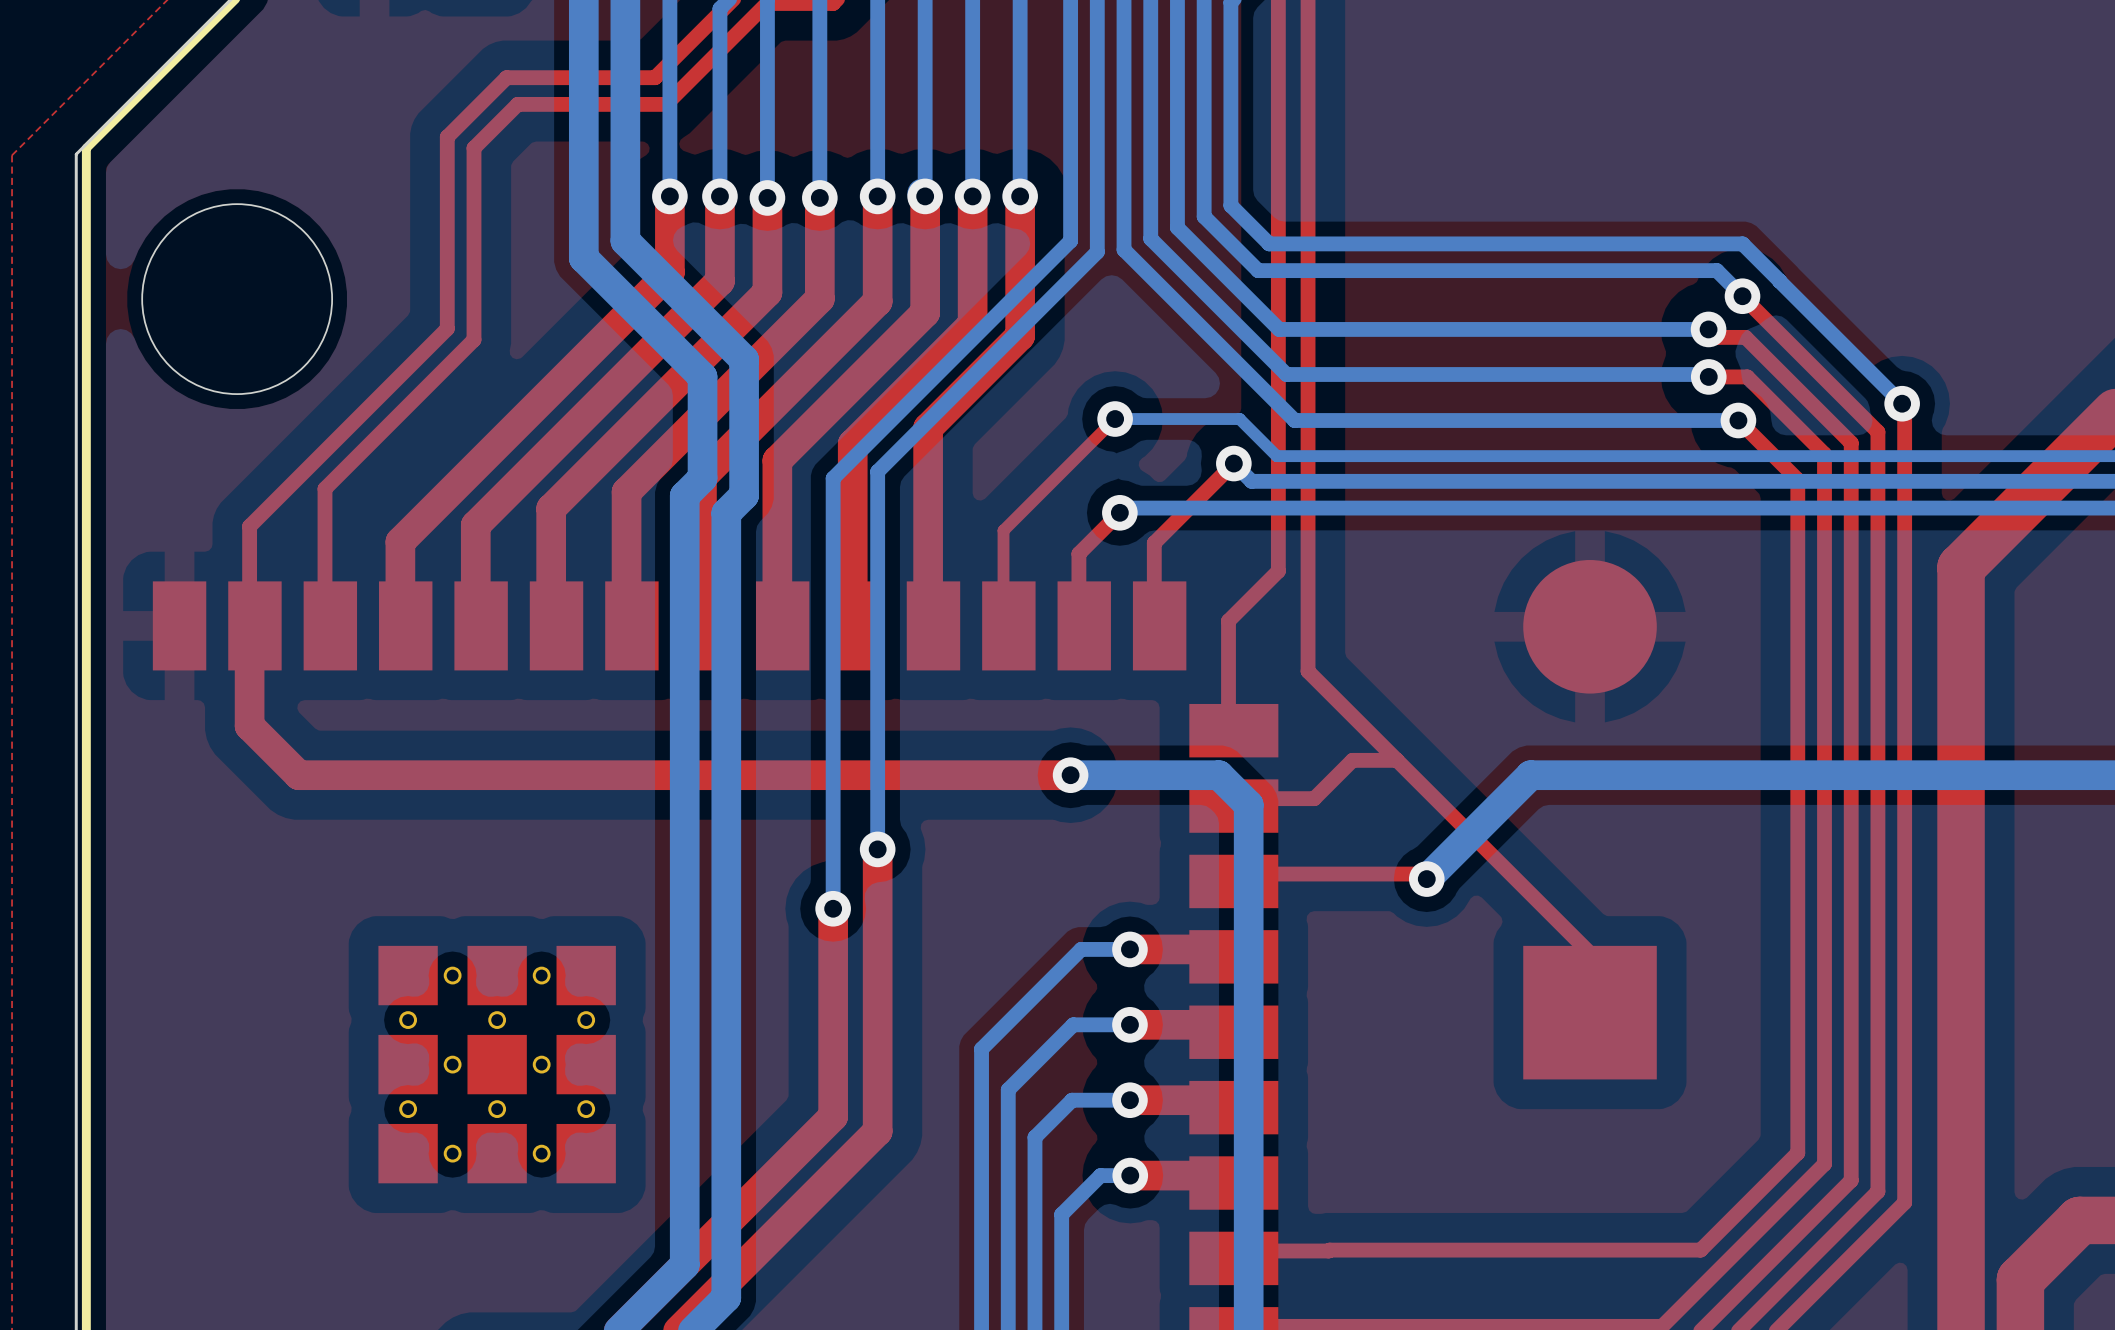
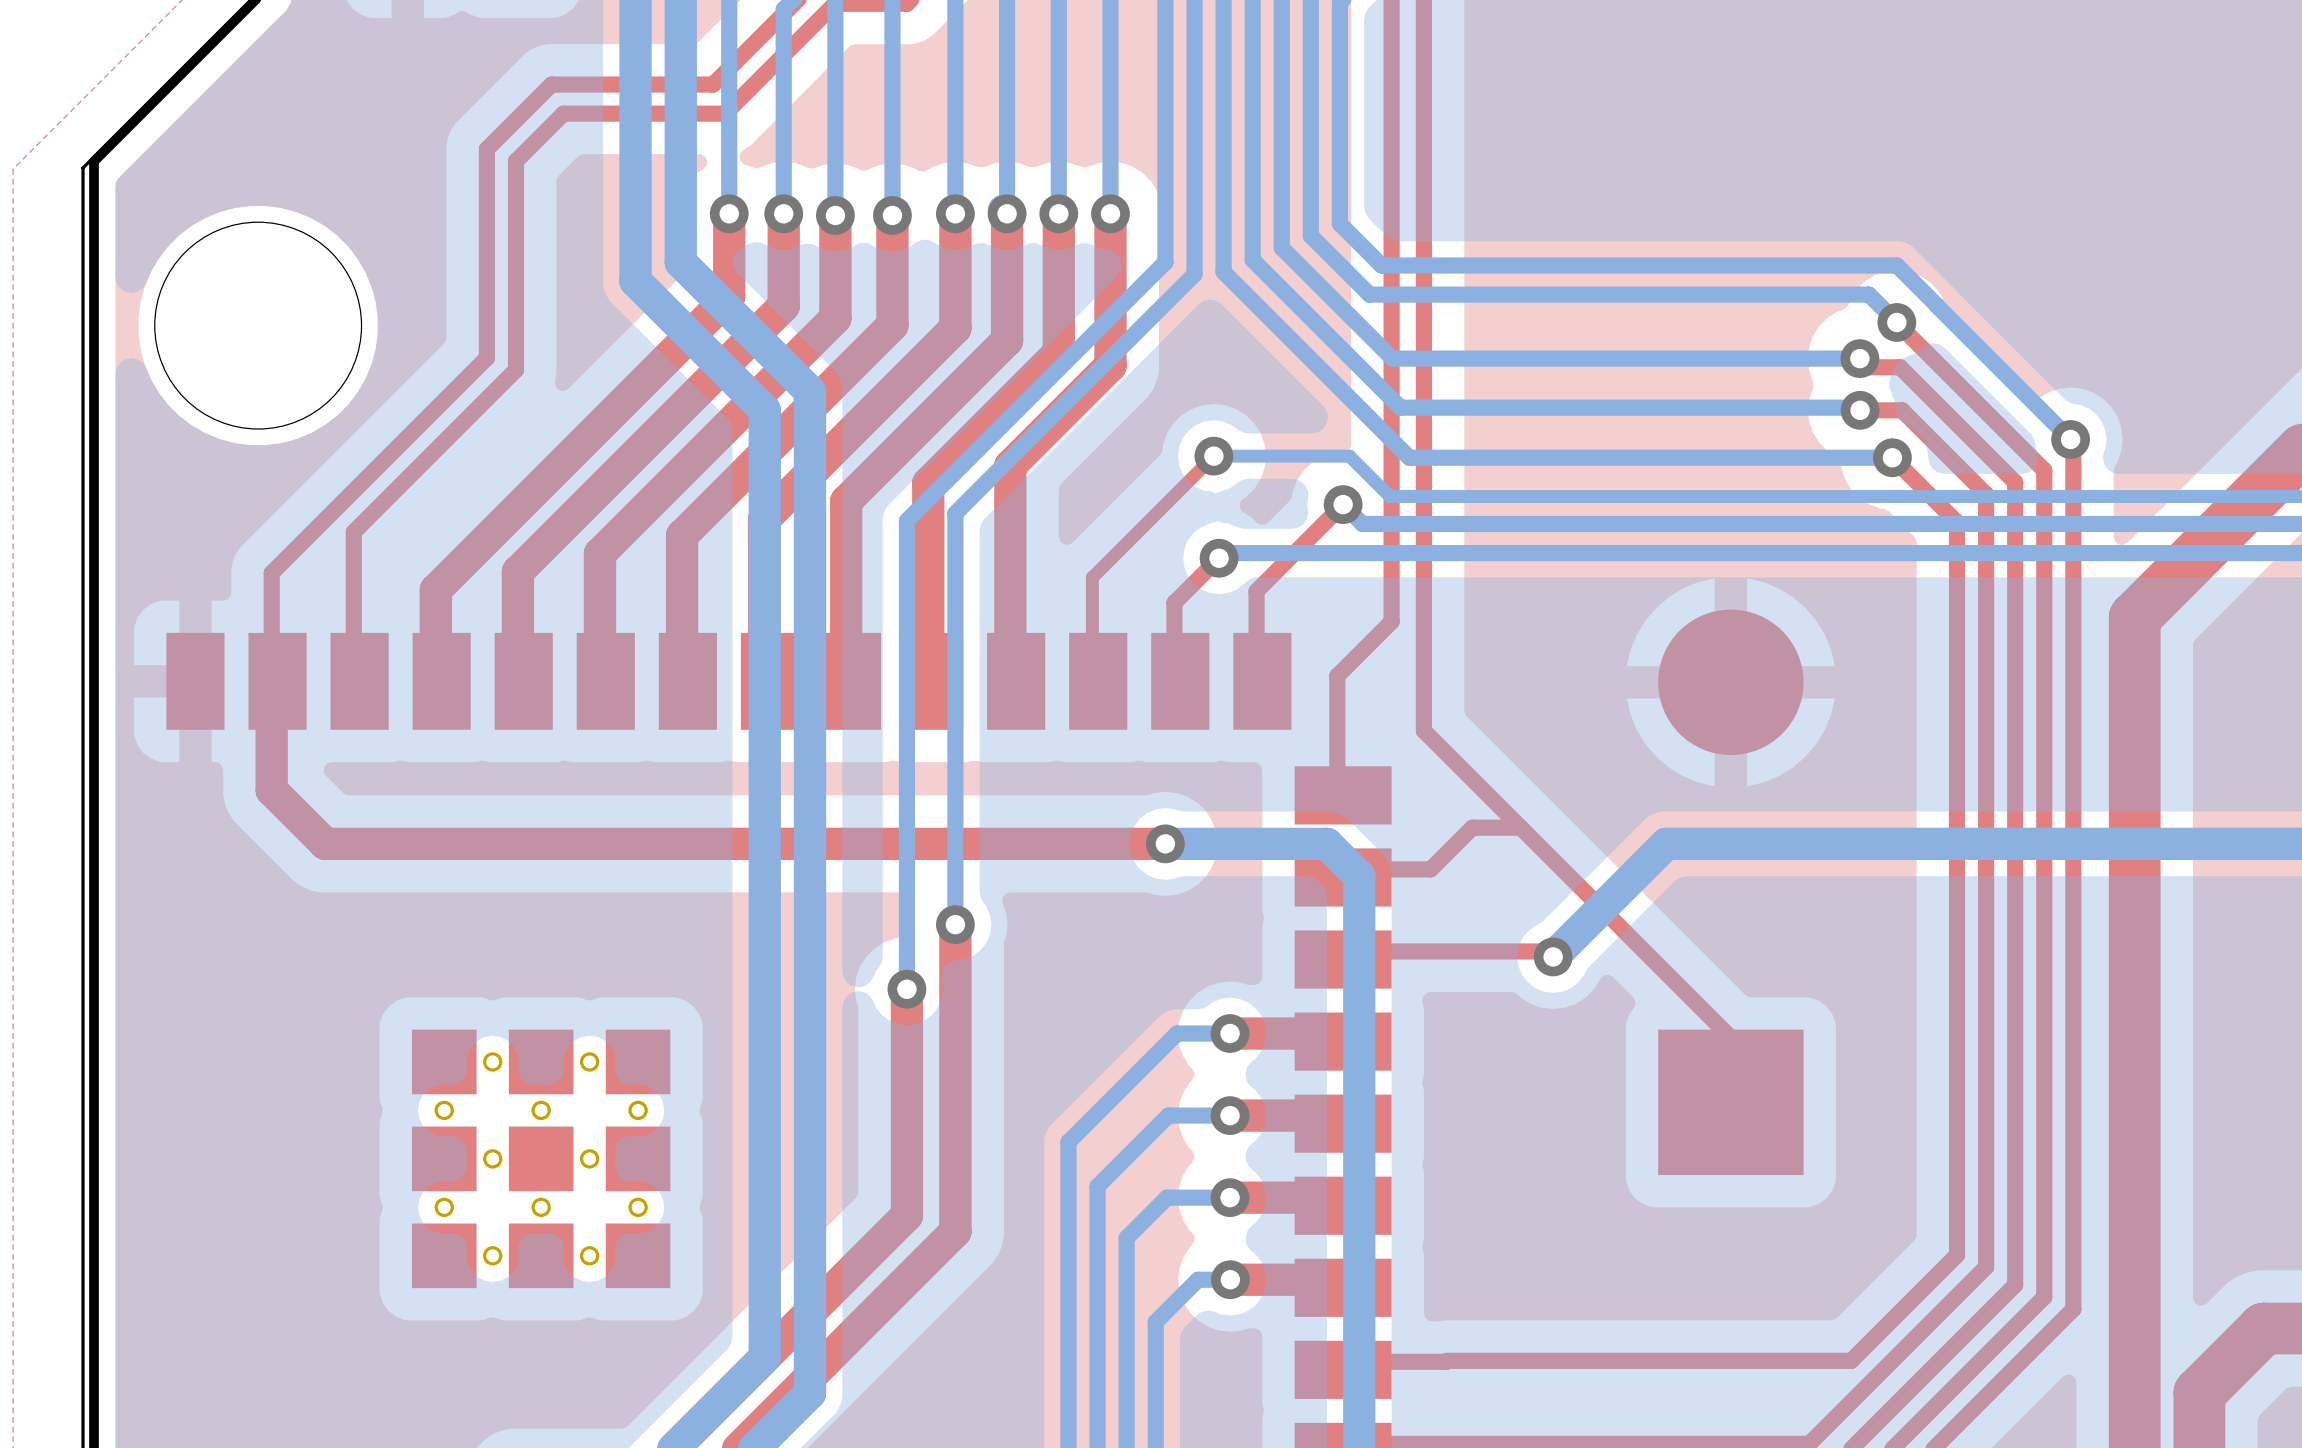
bottom track: (702, 478) (684, 495) (684, 1264) -> (764, 520) (764, 1357) (745, 1376)
bottom track: (744, 495) (726, 513) (726, 1297) -> (810, 539) (810, 1393) (790, 1412)

